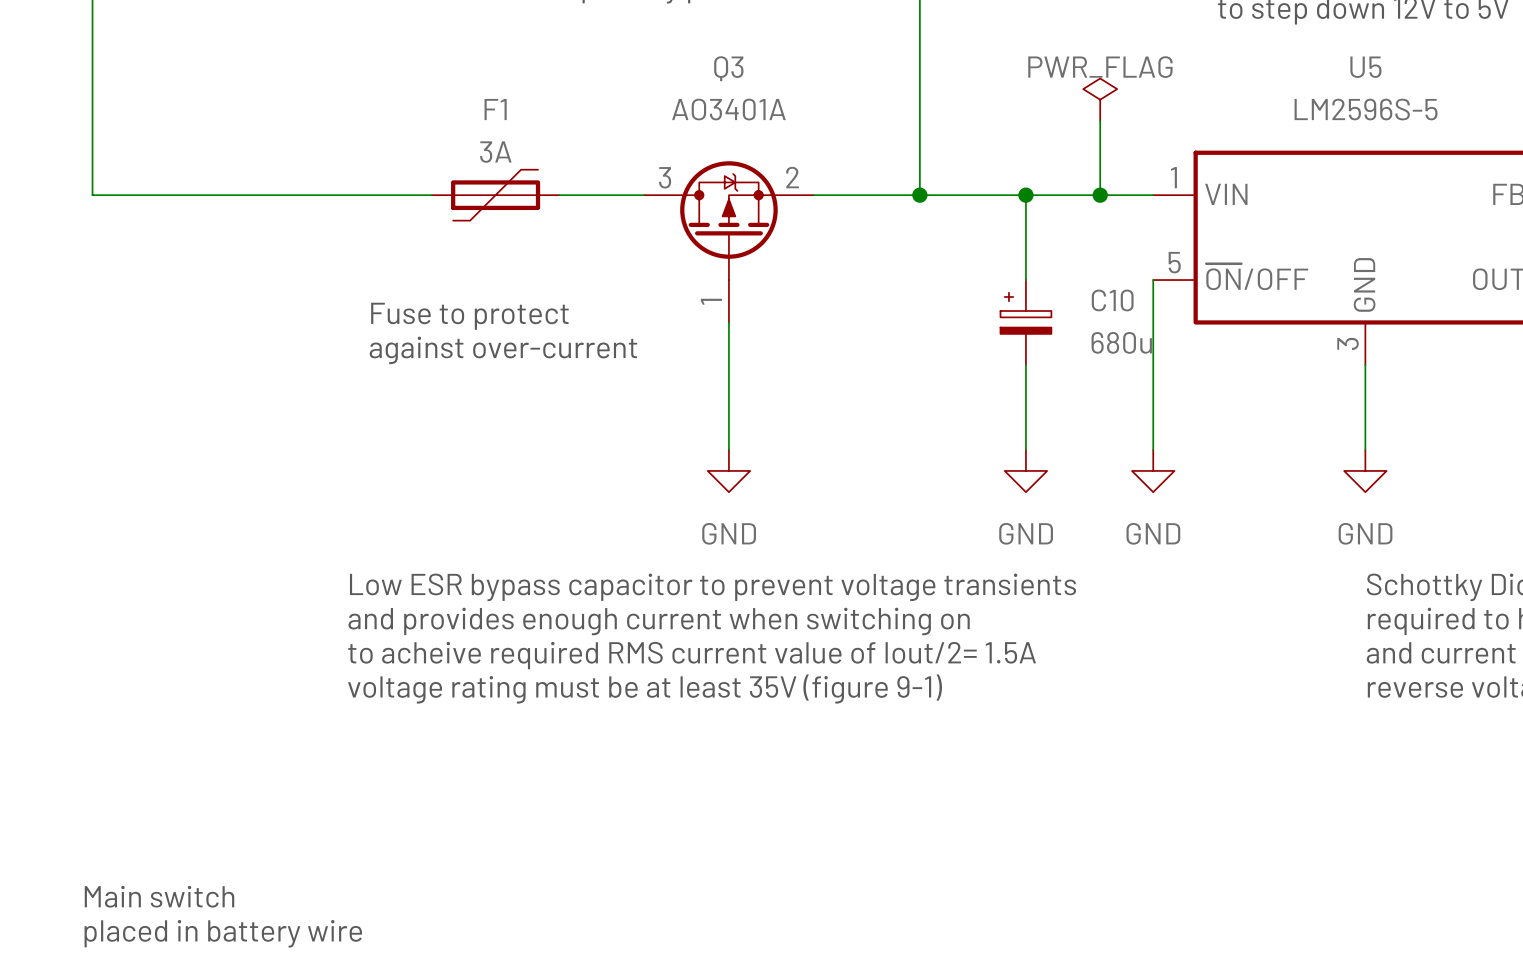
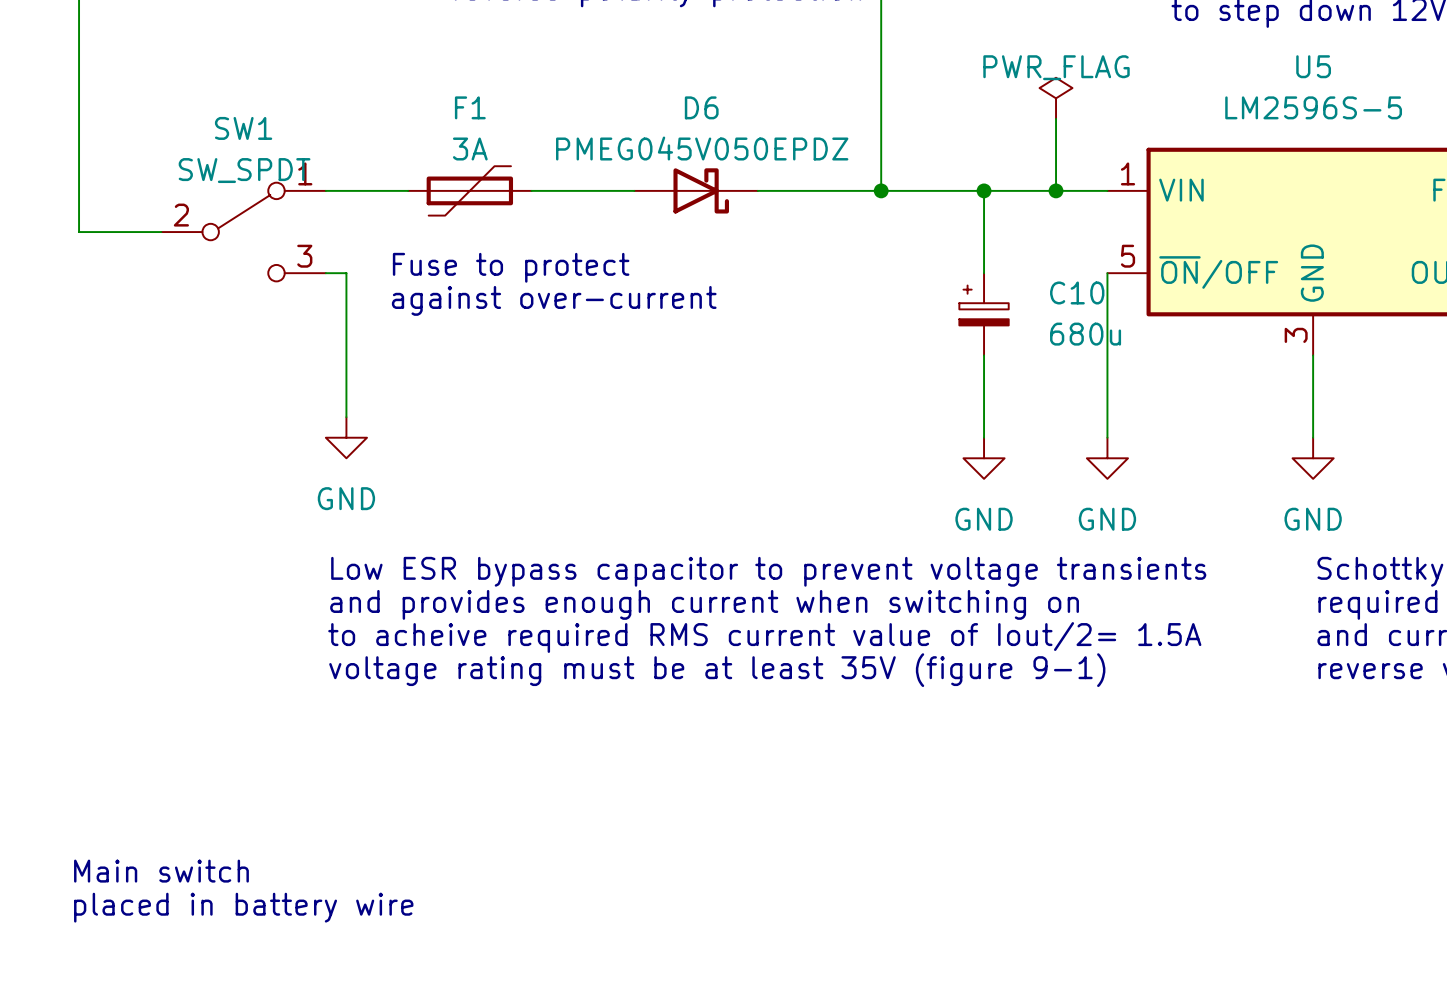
wire: (92, 195) (347, 195) -> (79, 190) (79, 232) (161, 232)
D6: none -> PMEG045V050EPDZ (696, 190)
SW1: none -> SW_SPDT (243, 232)
Q3: AO3401A (728, 241) -> none
wire: none -> (325, 273) (346, 273) (346, 417)
text position: Fuse to protect (469, 316) -> Fuse to protect (511, 267)
wire: (728, 322) (728, 449) -> none
text position: against over-current (503, 350) -> against over-current (554, 300)
power symbol position: GND (728, 470) -> GND (346, 437)

